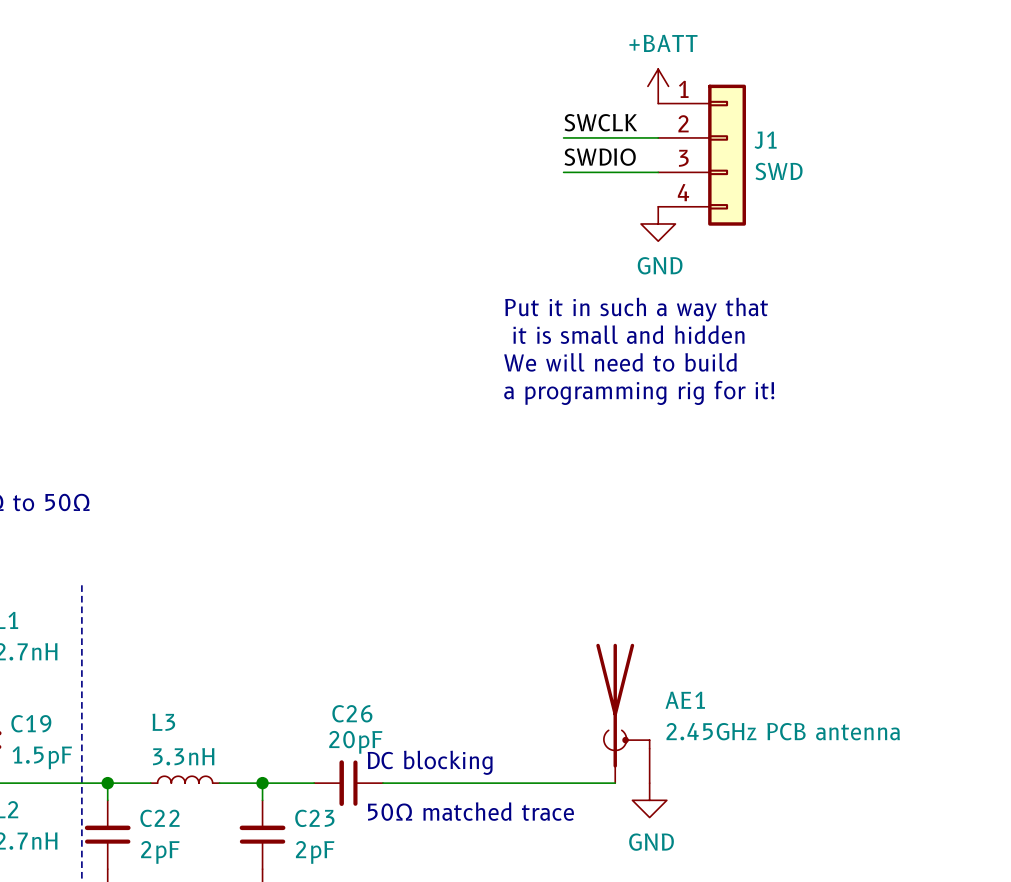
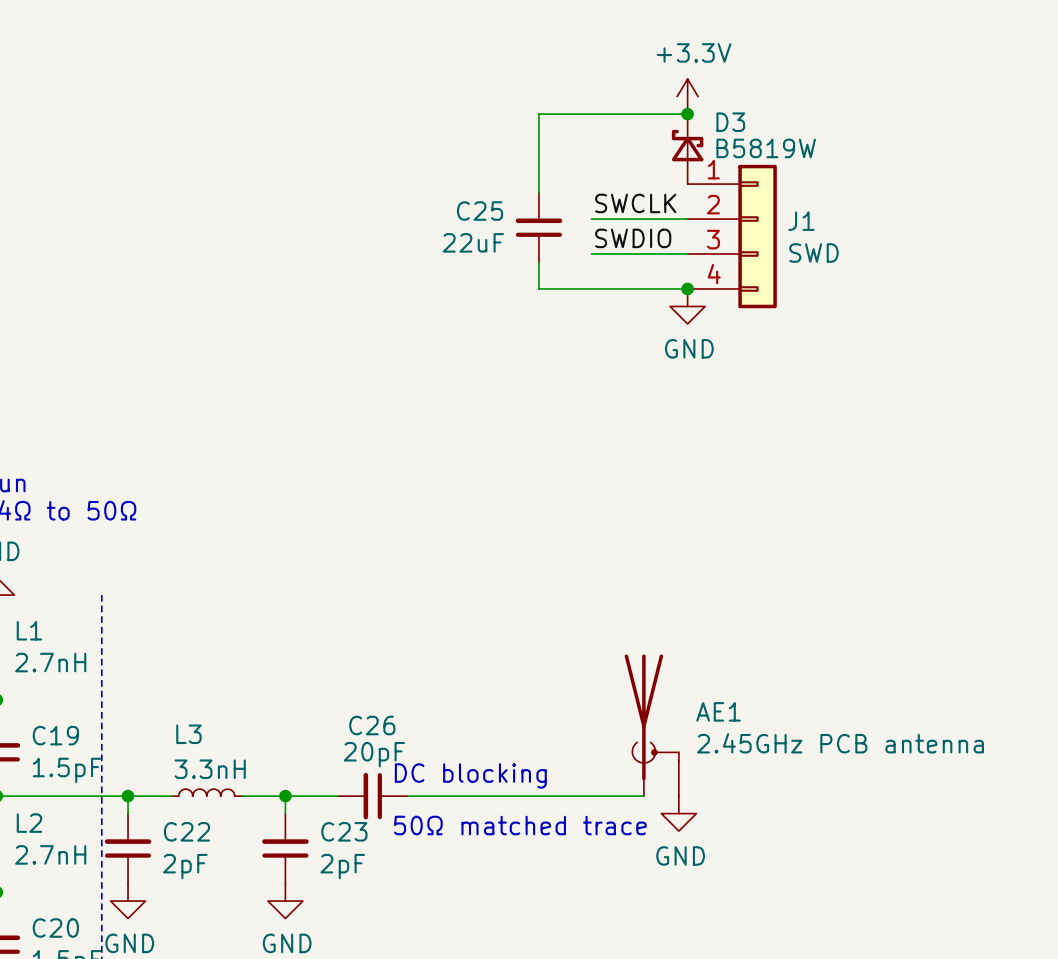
power symbol: +BATT (658, 86) -> +3.3V (687, 96)
wire: none -> (687, 114) (538, 114) (538, 192)
junction: none -> (687, 114)
label position: SWCLK (600, 122) -> SWCLK (635, 203)
wire: (563, 137) (658, 137) -> (591, 219) (687, 219)
D3: none -> B5819W (687, 149)
J1 position: (702, 155) -> (732, 236)
label position: SWDIO (600, 157) -> SWDIO (633, 238)
wire: (563, 172) (658, 172) -> (591, 254) (687, 254)
C25: none -> 22uF (538, 227)
power symbol position: GND (658, 223) -> GND (687, 306)
wire: none -> (538, 262) (538, 288) (687, 288)
junction: none -> (687, 288)
text: Put it in such a way that (636, 309) -> none
text: it is small and hidden (629, 334) -> none
text: We will need to build (620, 362) -> none
text: a programming rig for it! (639, 392) -> none

